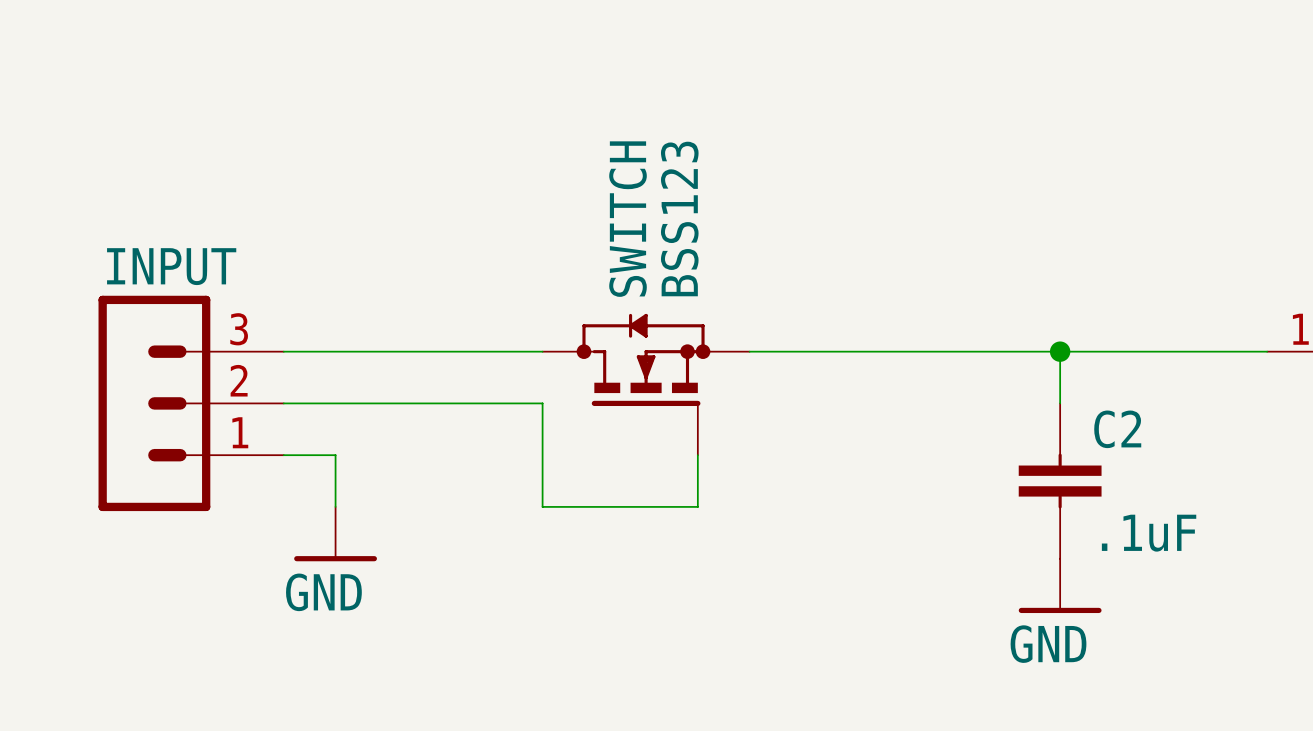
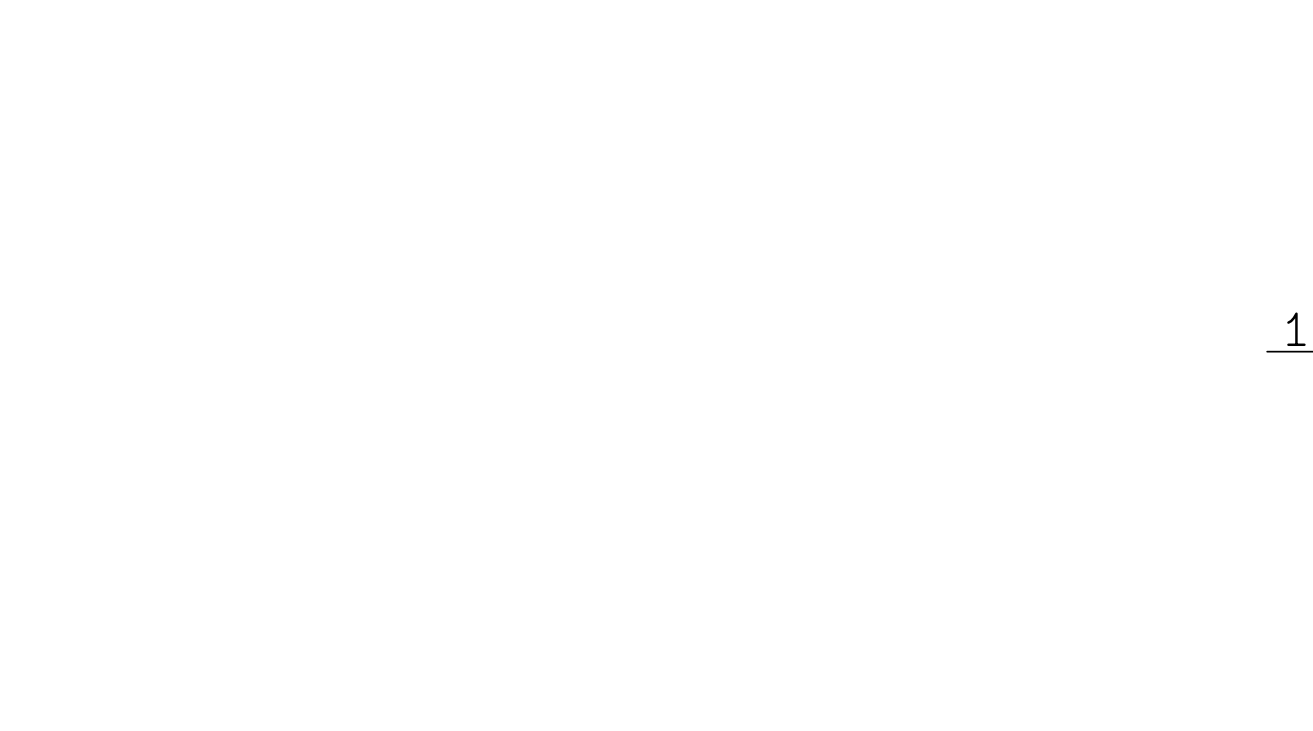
wire: (283, 351) (542, 351) -> none
wire: (749, 351) (1267, 351) -> none
wire: (1060, 351) (1060, 403) -> none
junction: (1060, 351) -> none
SWITCH: BSS123 (646, 384) -> none
INPUT: (191, 403) -> none
wire: (283, 403) (542, 403) (542, 506) (697, 506) (697, 455) -> none
wire: (283, 455) (335, 455) (335, 506) -> none
C2: .1uF (1060, 481) -> none
power symbol: GND (335, 534) -> none
power symbol: GND (1060, 585) -> none

